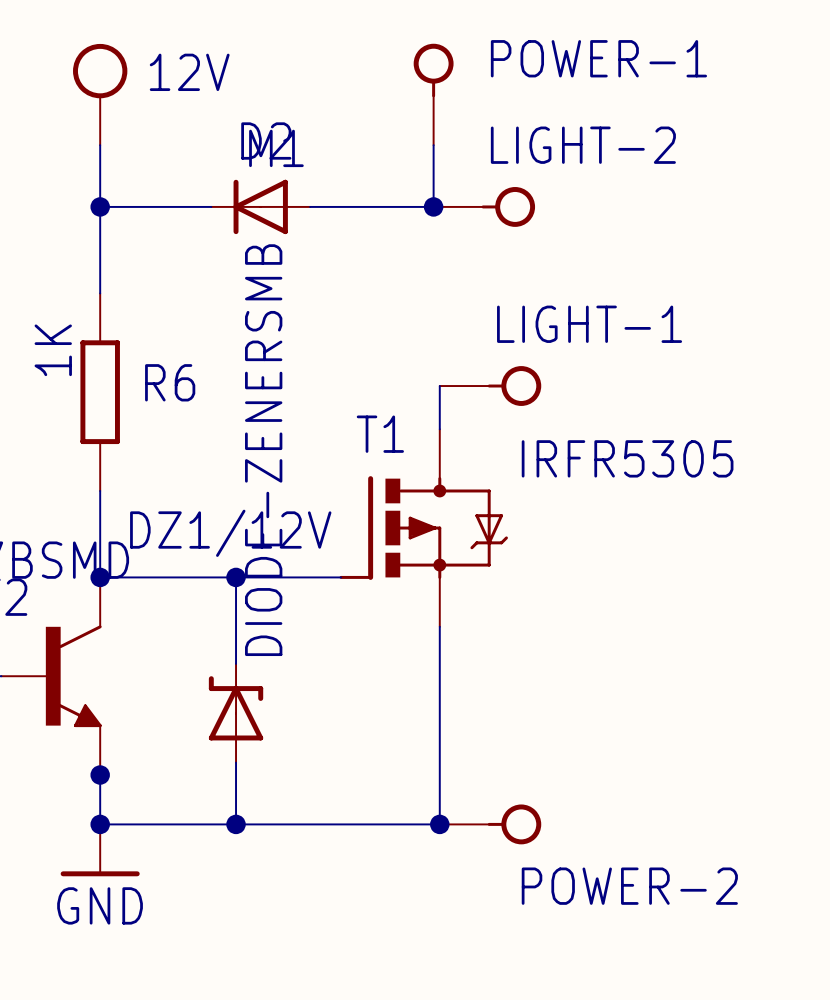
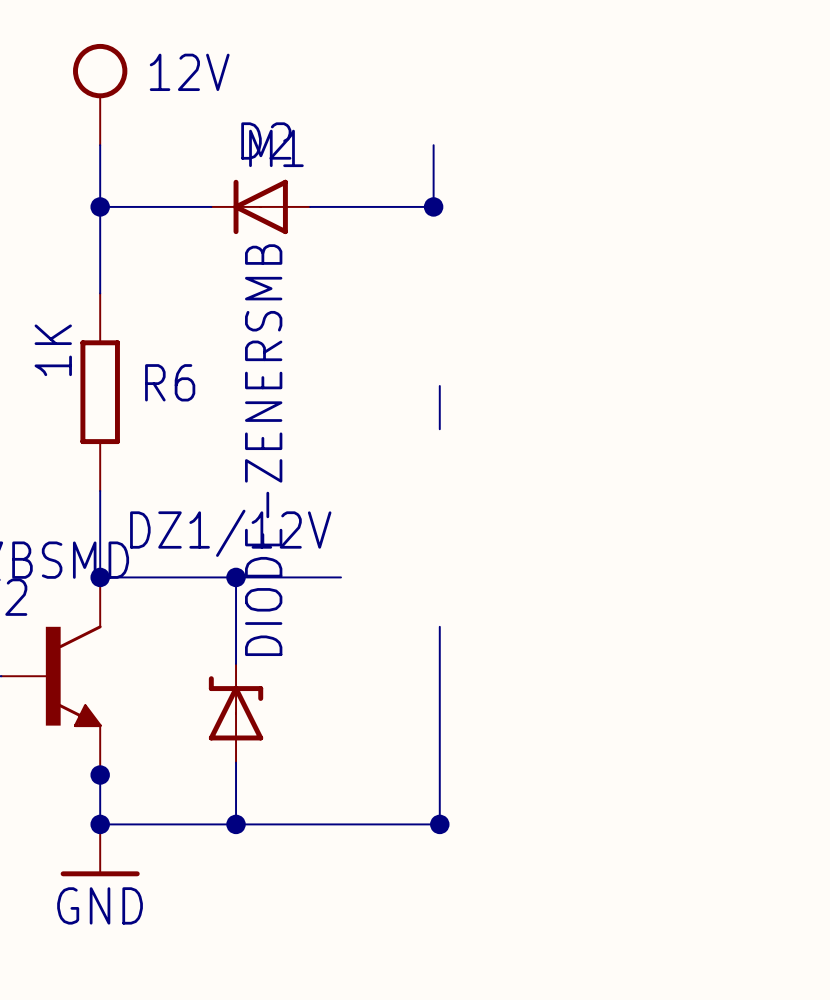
POWER-1: (433, 94) -> none
LIGHT-2: (484, 206) -> none
LIGHT-1: (490, 386) -> none
T1: IRFR5305 (423, 528) -> none
POWER-2: (490, 824) -> none

